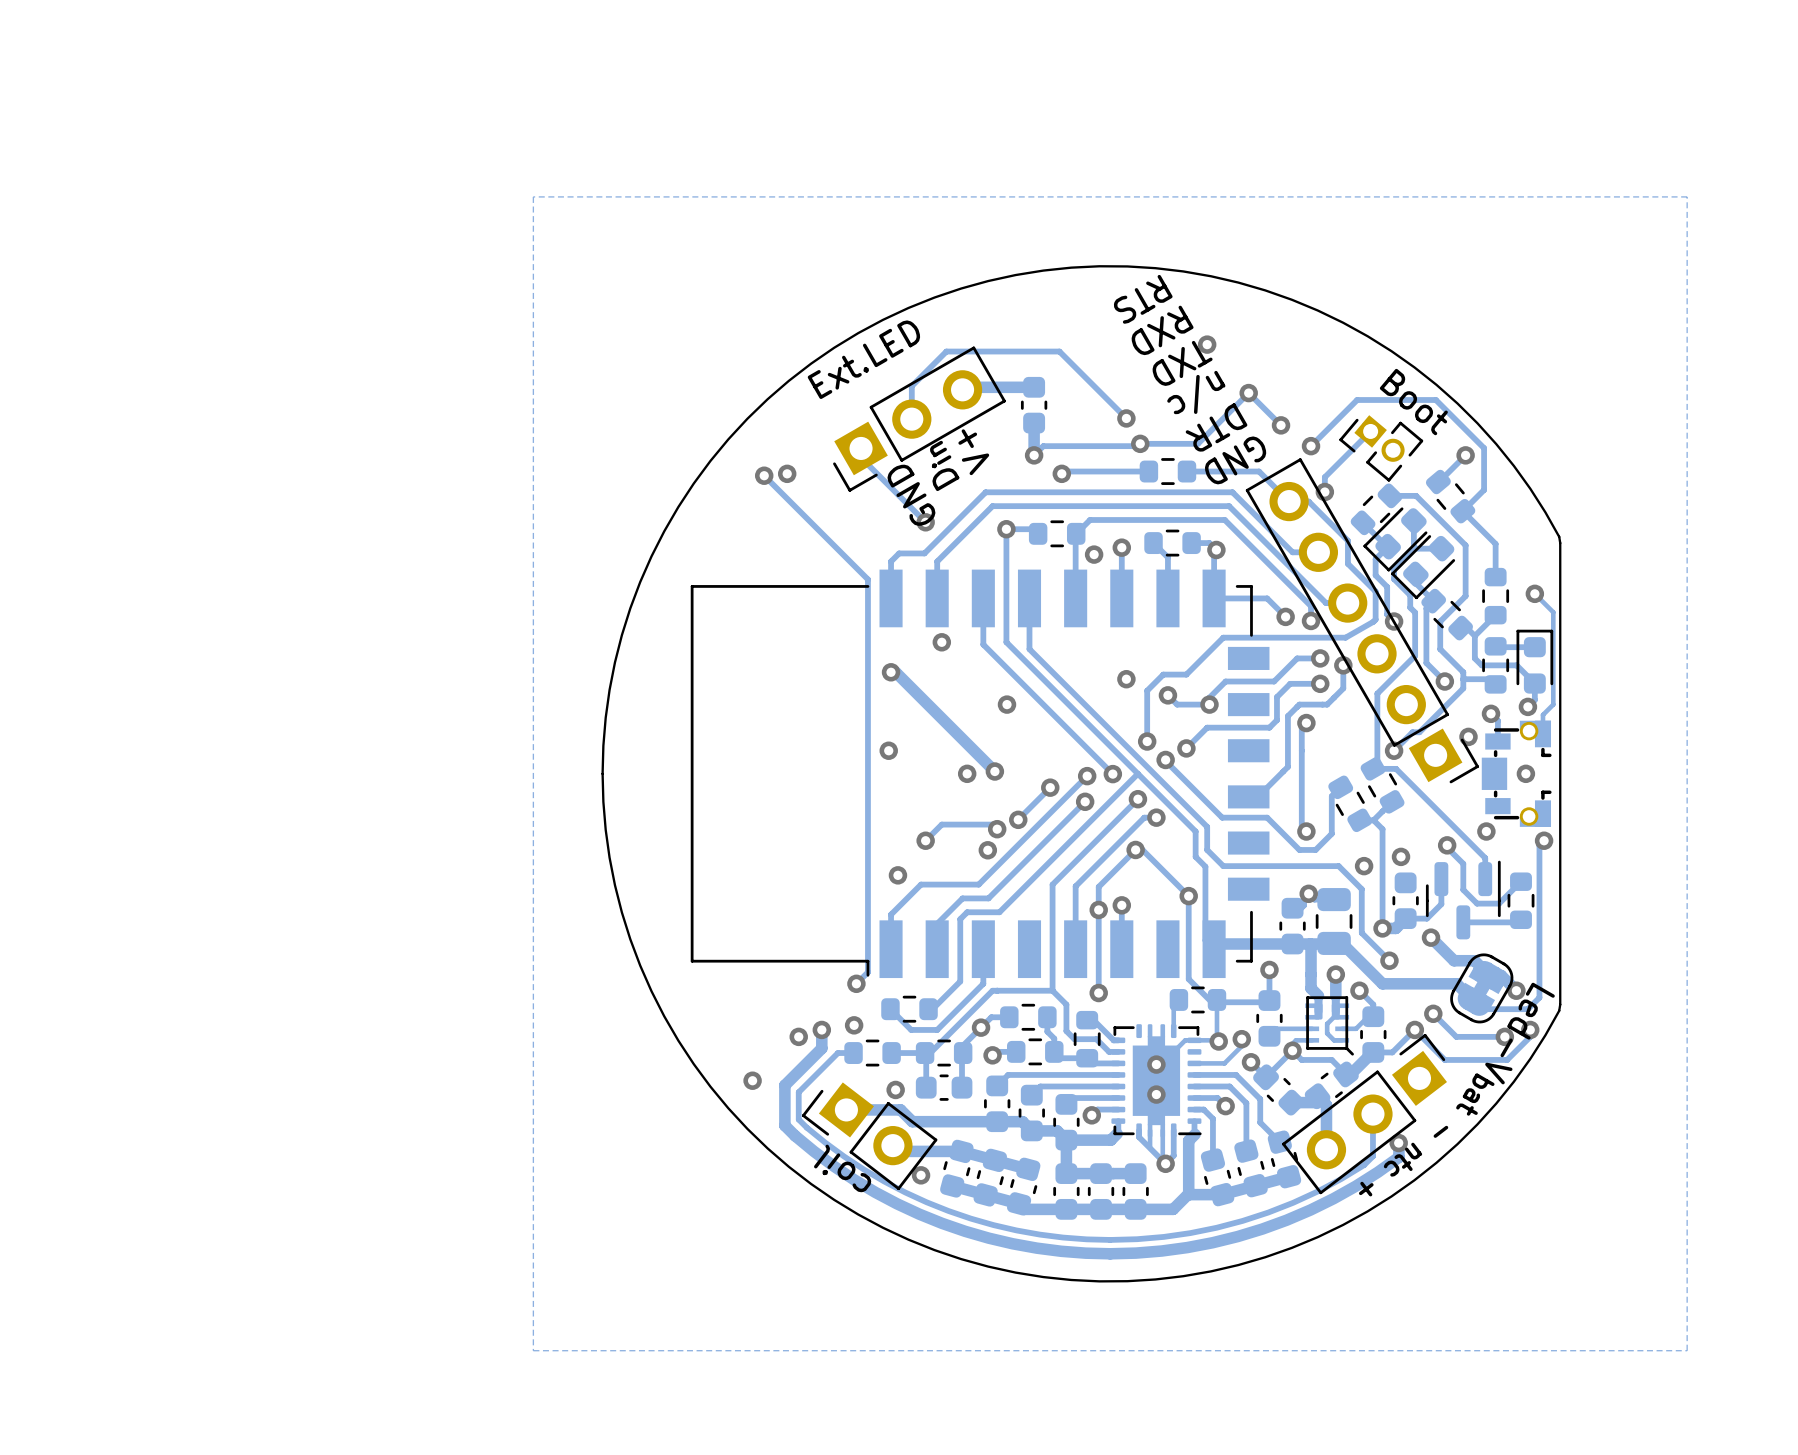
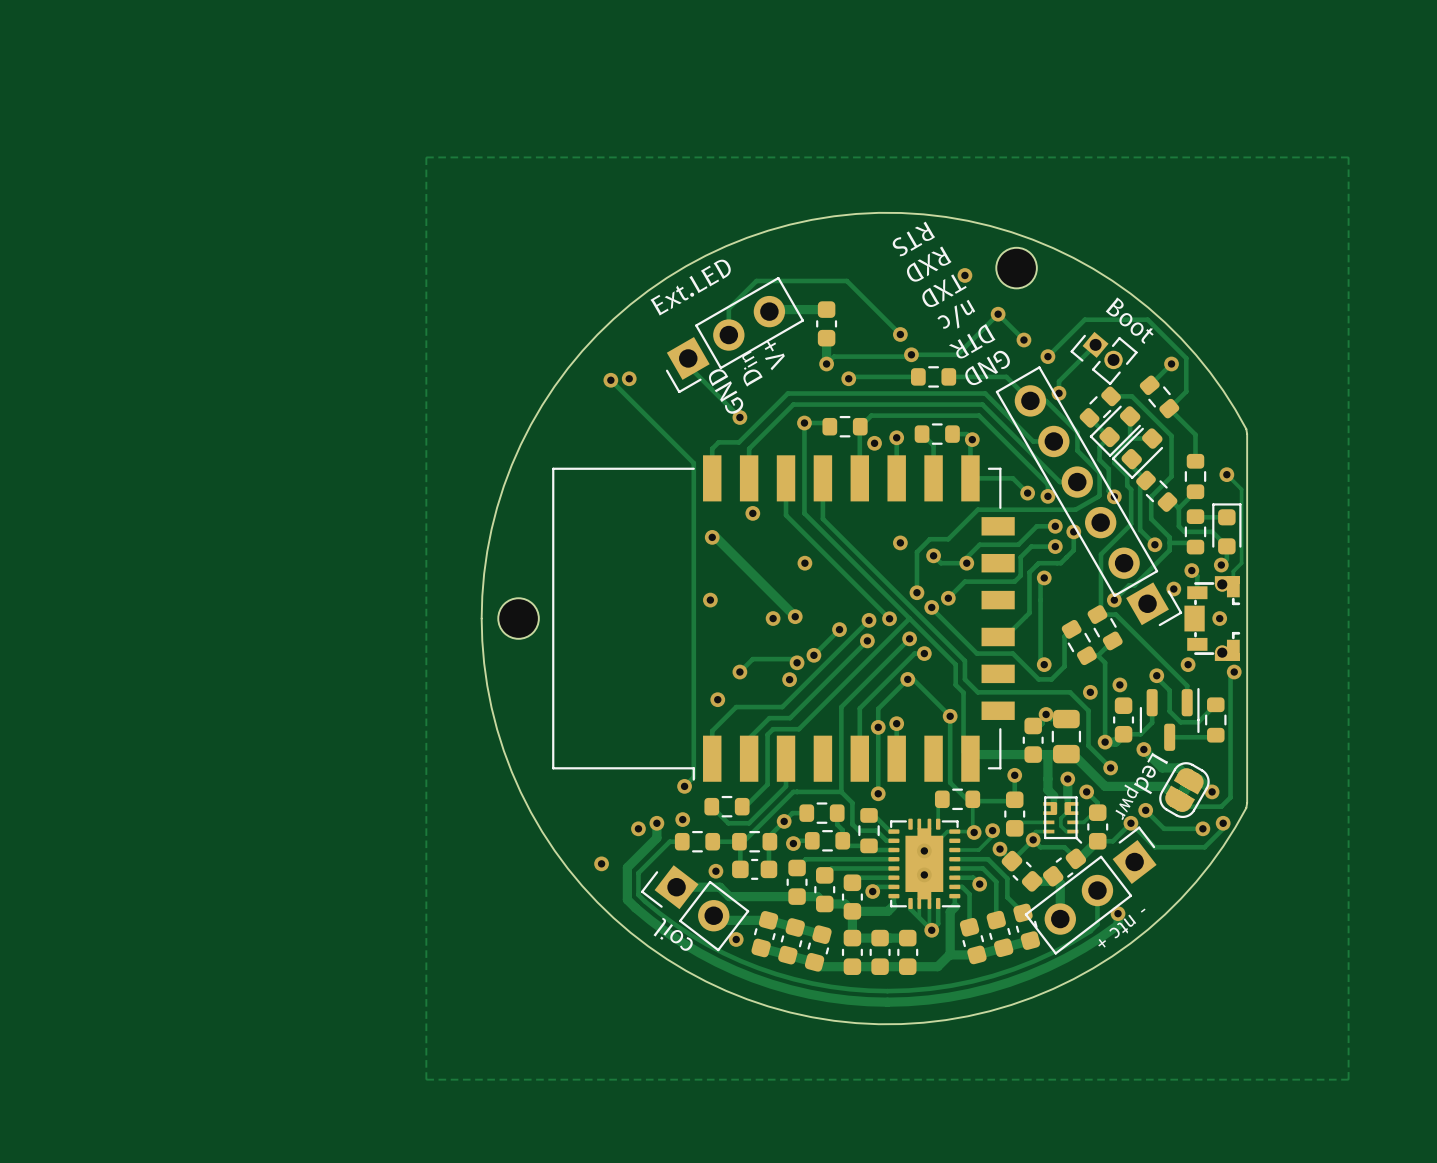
part: none -> (1016, 268)
part: none -> (518, 618)
part text: none -> Ledpwr (1141, 786)
part text: Led-Vbat (1505, 1049) -> none

